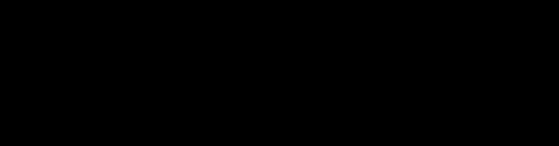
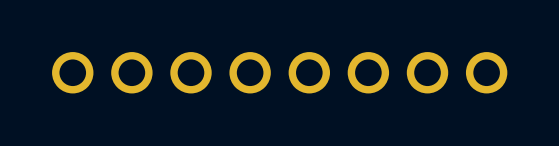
part: none -> (279, 72)

